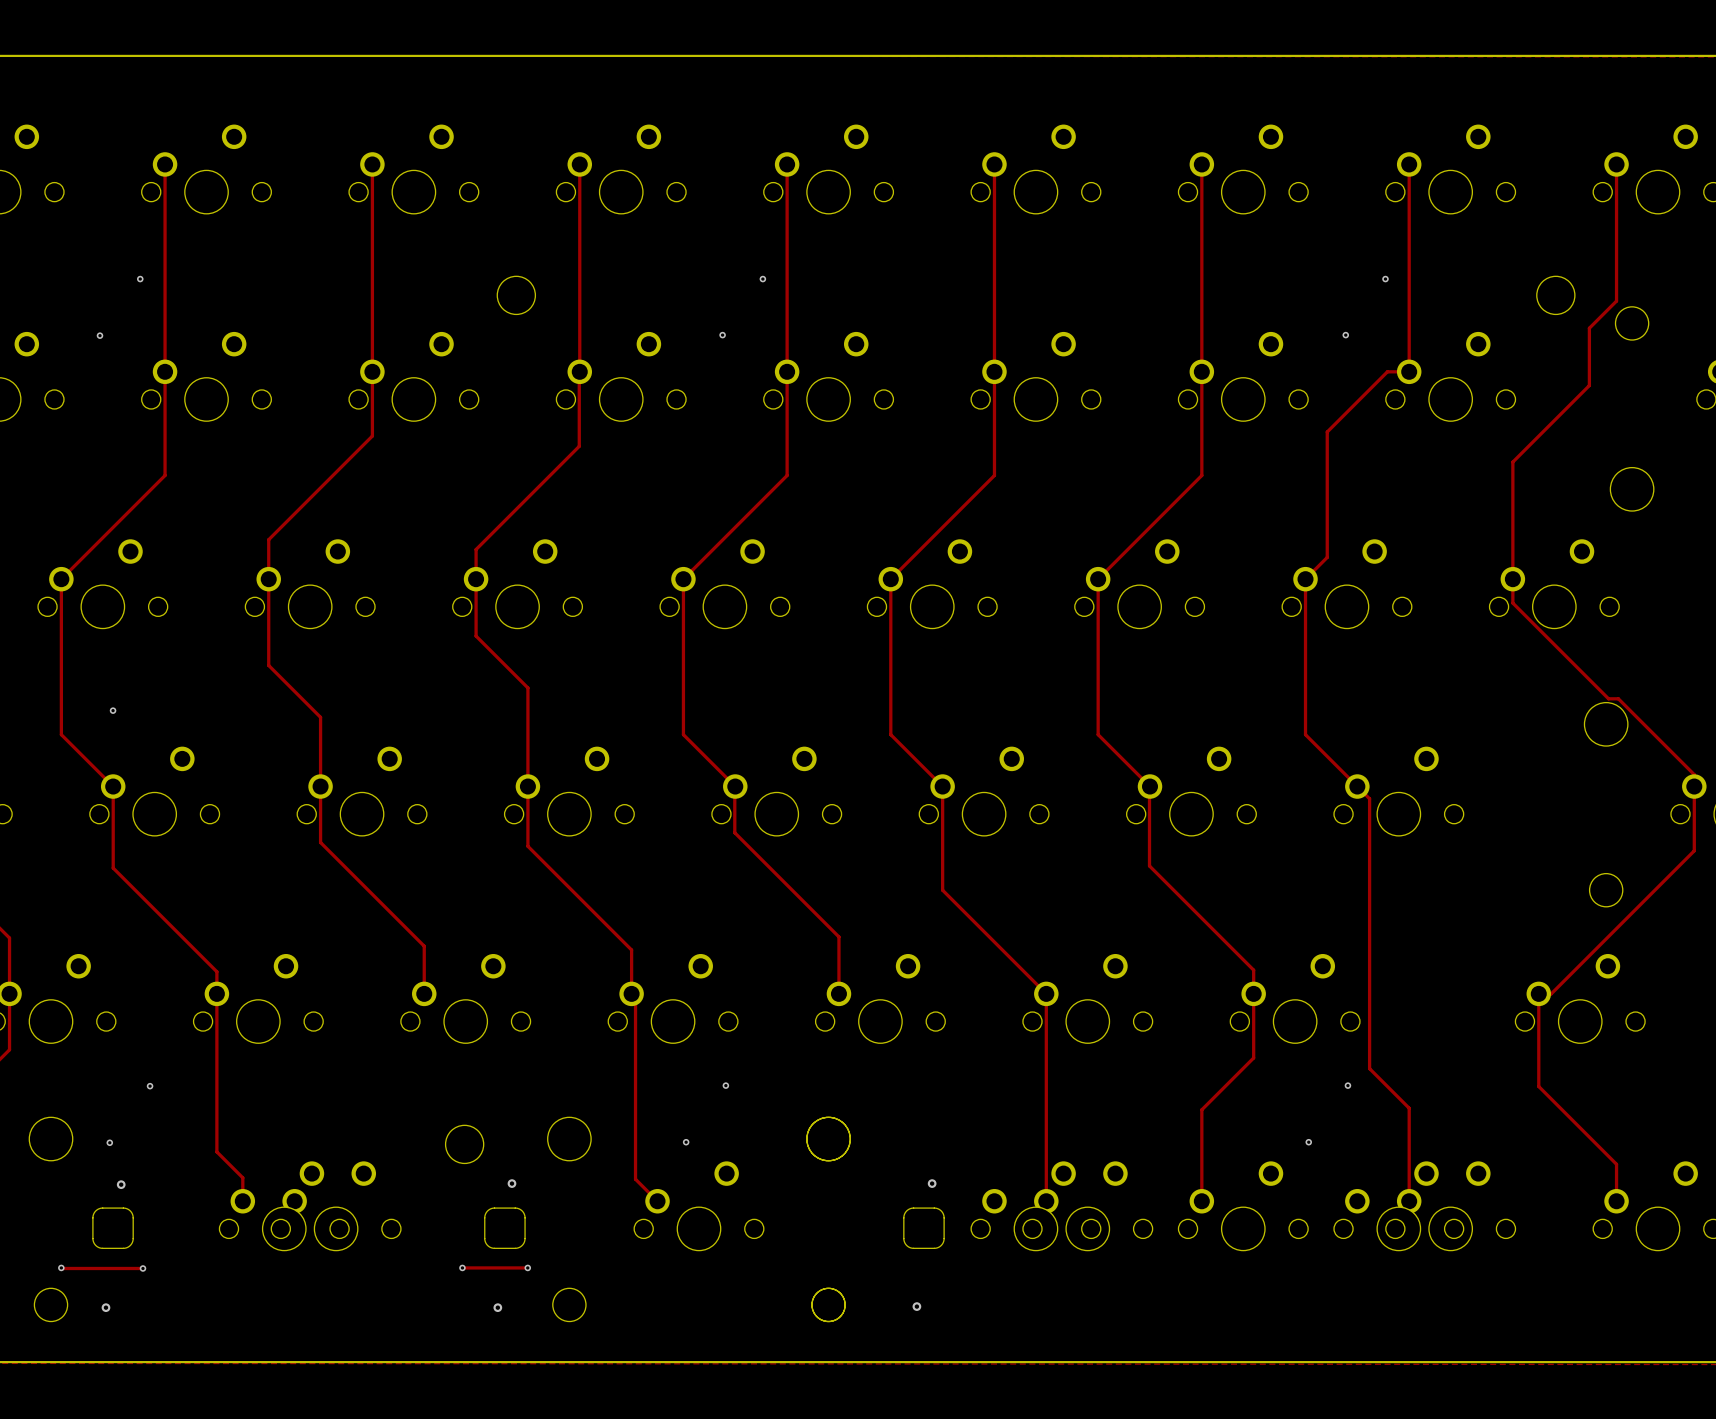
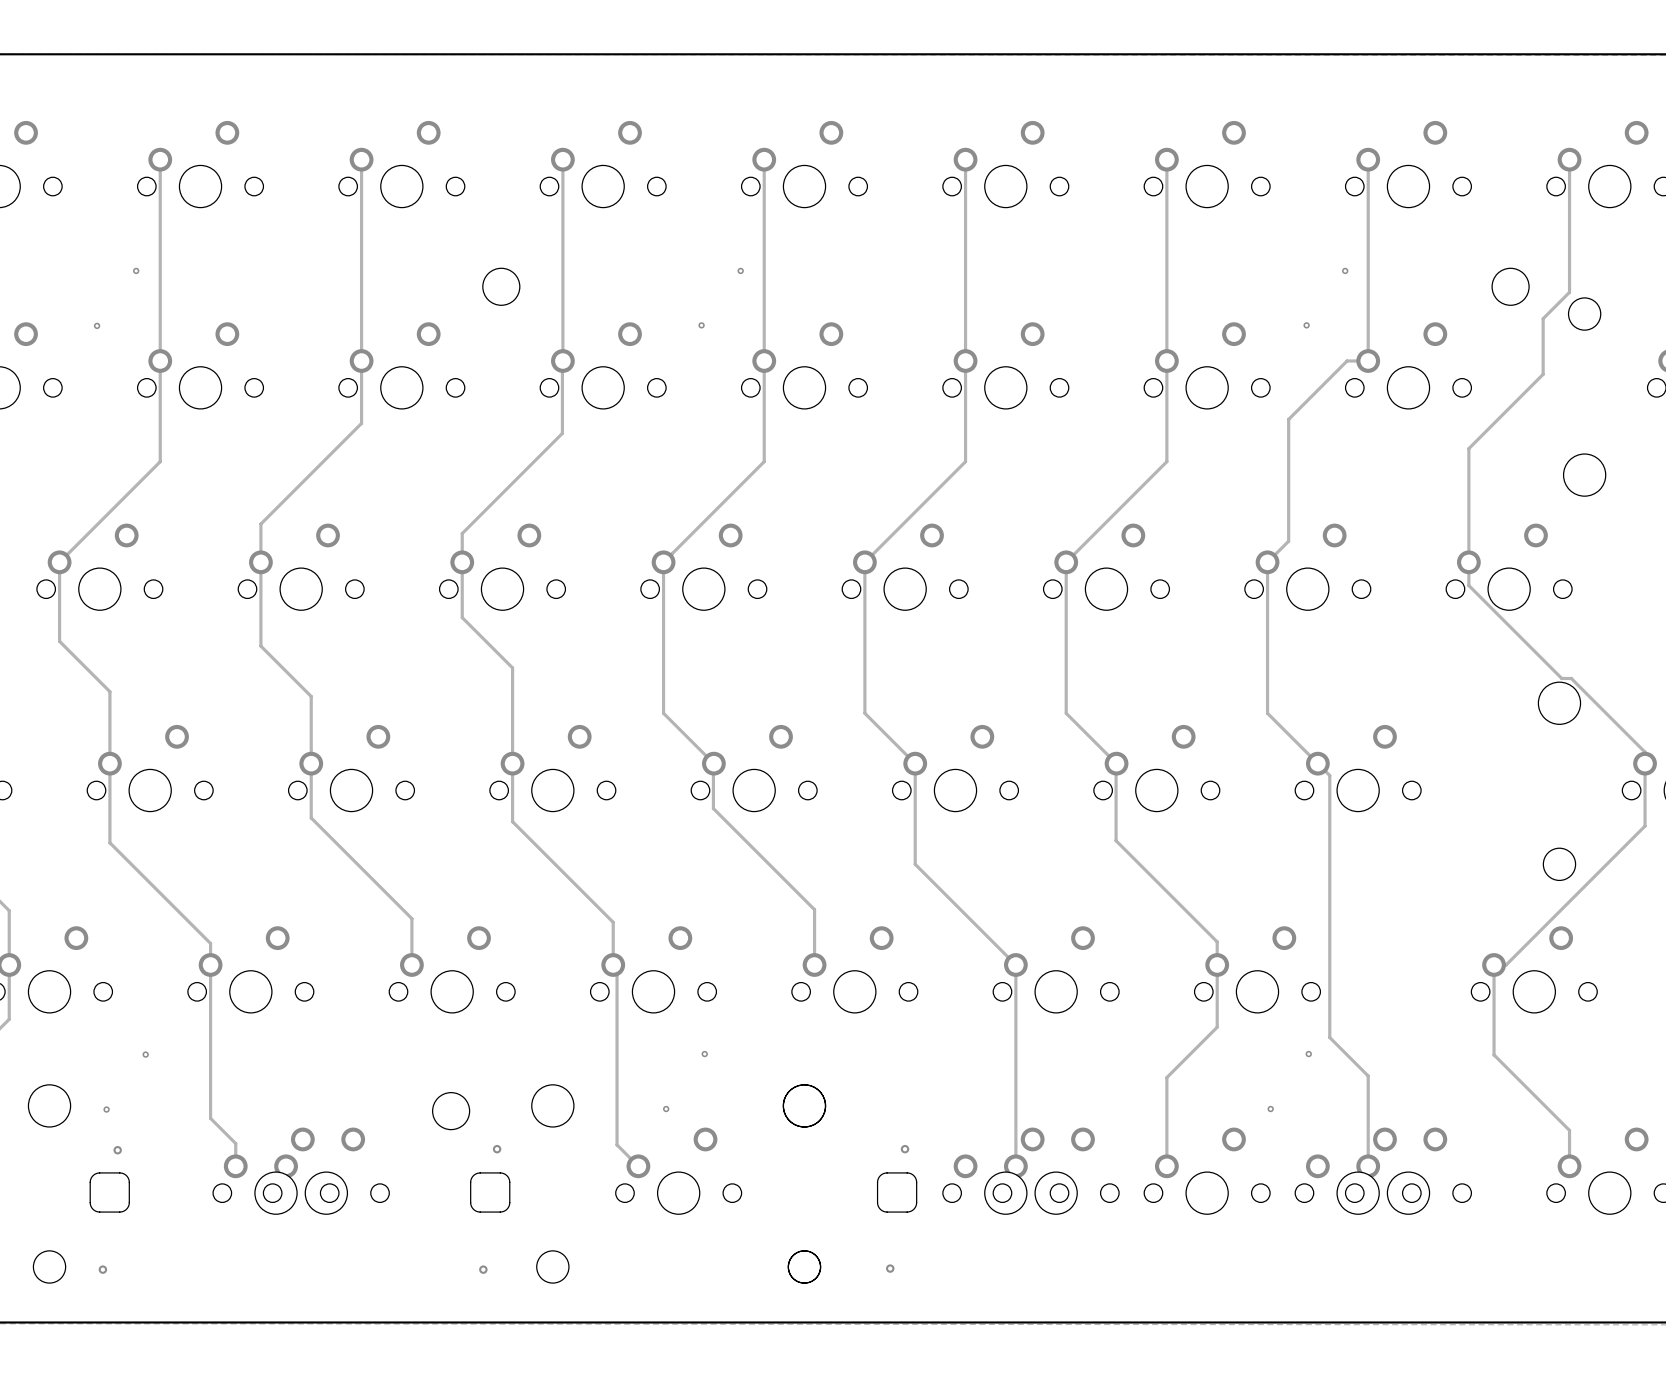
track: (61, 660) (61, 734) (113, 786) -> (59, 641) (109, 691) (109, 763)
via: (113, 710) -> none
track: (61, 1267) (142, 1268) -> none
via: (61, 1267) -> none
track: (462, 1267) (527, 1267) -> none
via: (462, 1267) -> none
via: (527, 1267) -> none
via: (142, 1268) -> none

